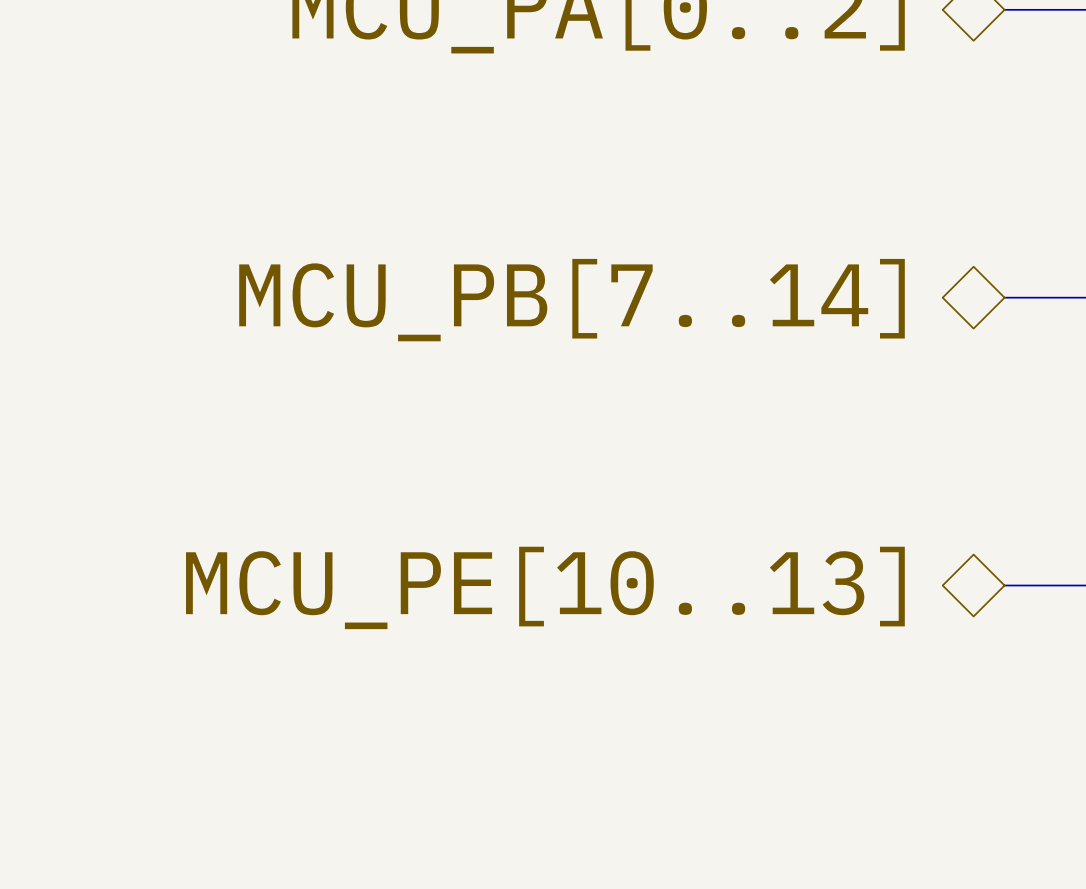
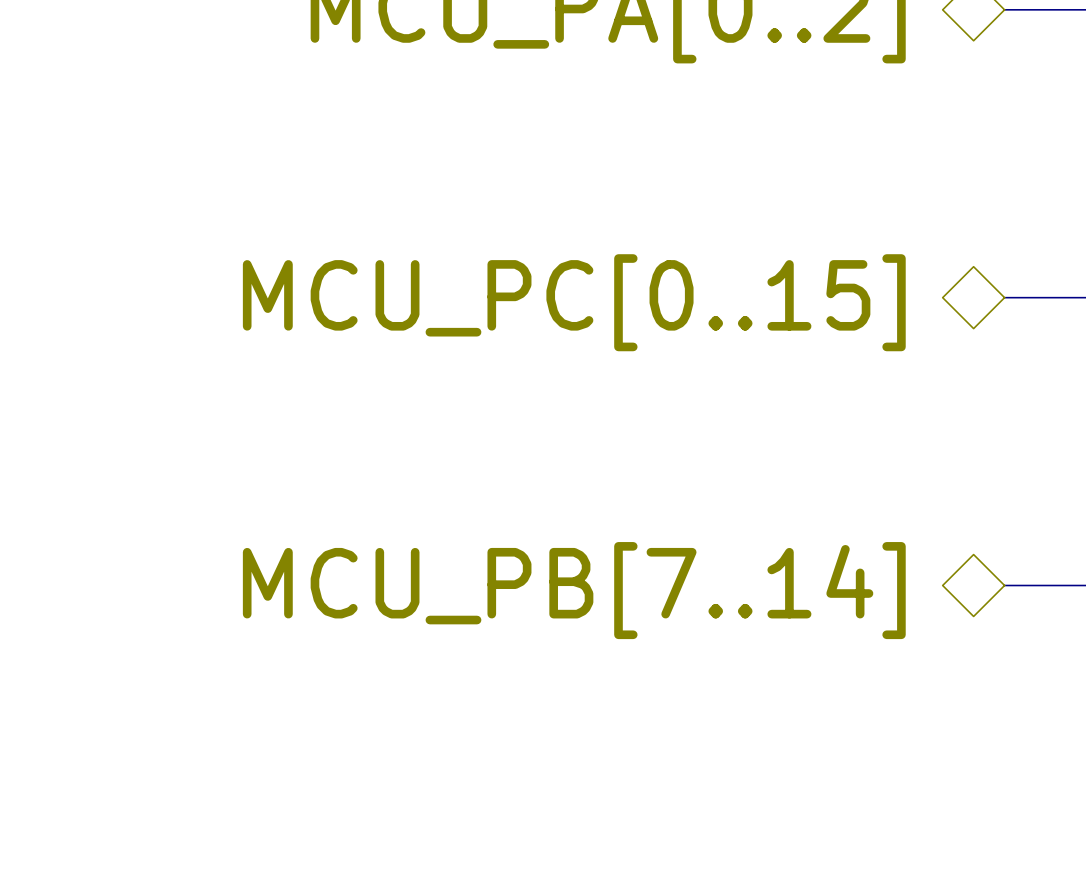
hierarchical label: MCU_PB[7..14] (572, 300) -> MCU_PC[0..15] (574, 302)
hierarchical label: MCU_PE[10..13] (545, 587) -> MCU_PB[7..14] (574, 590)

